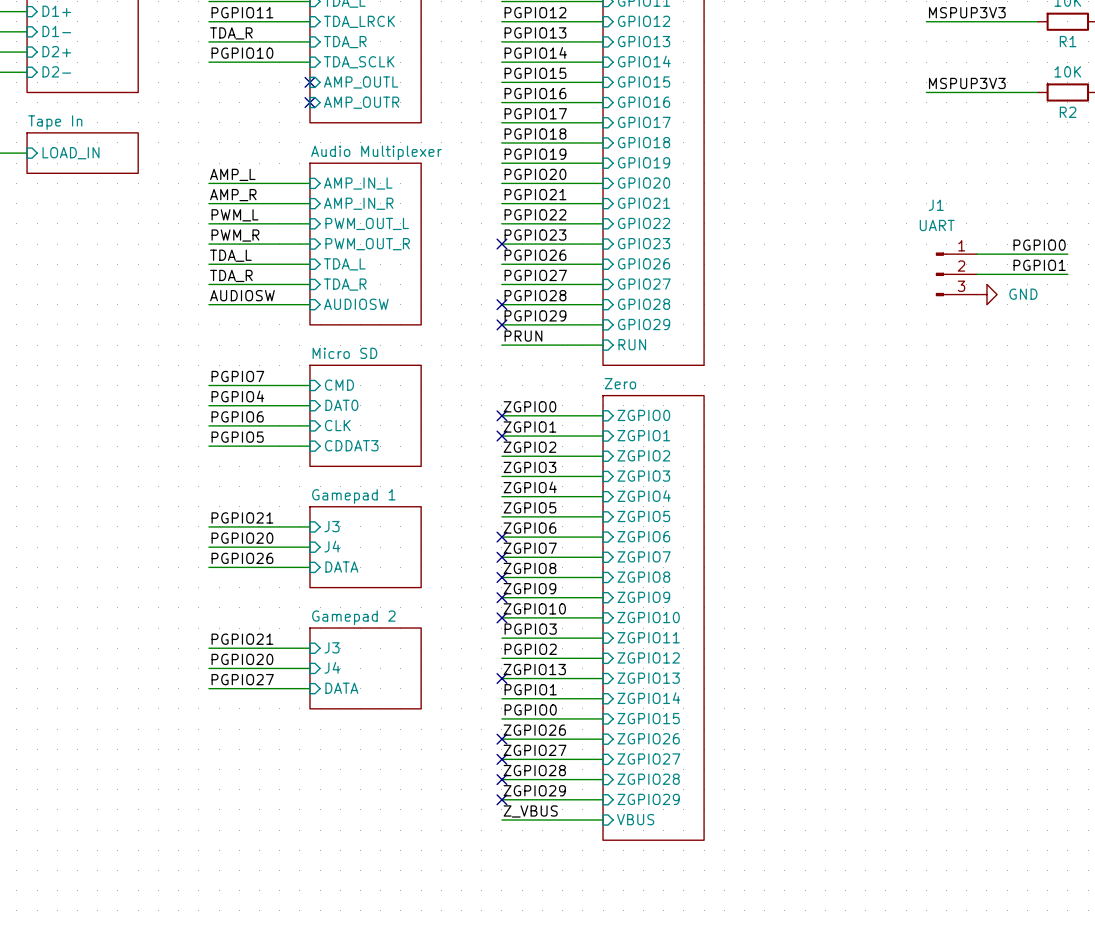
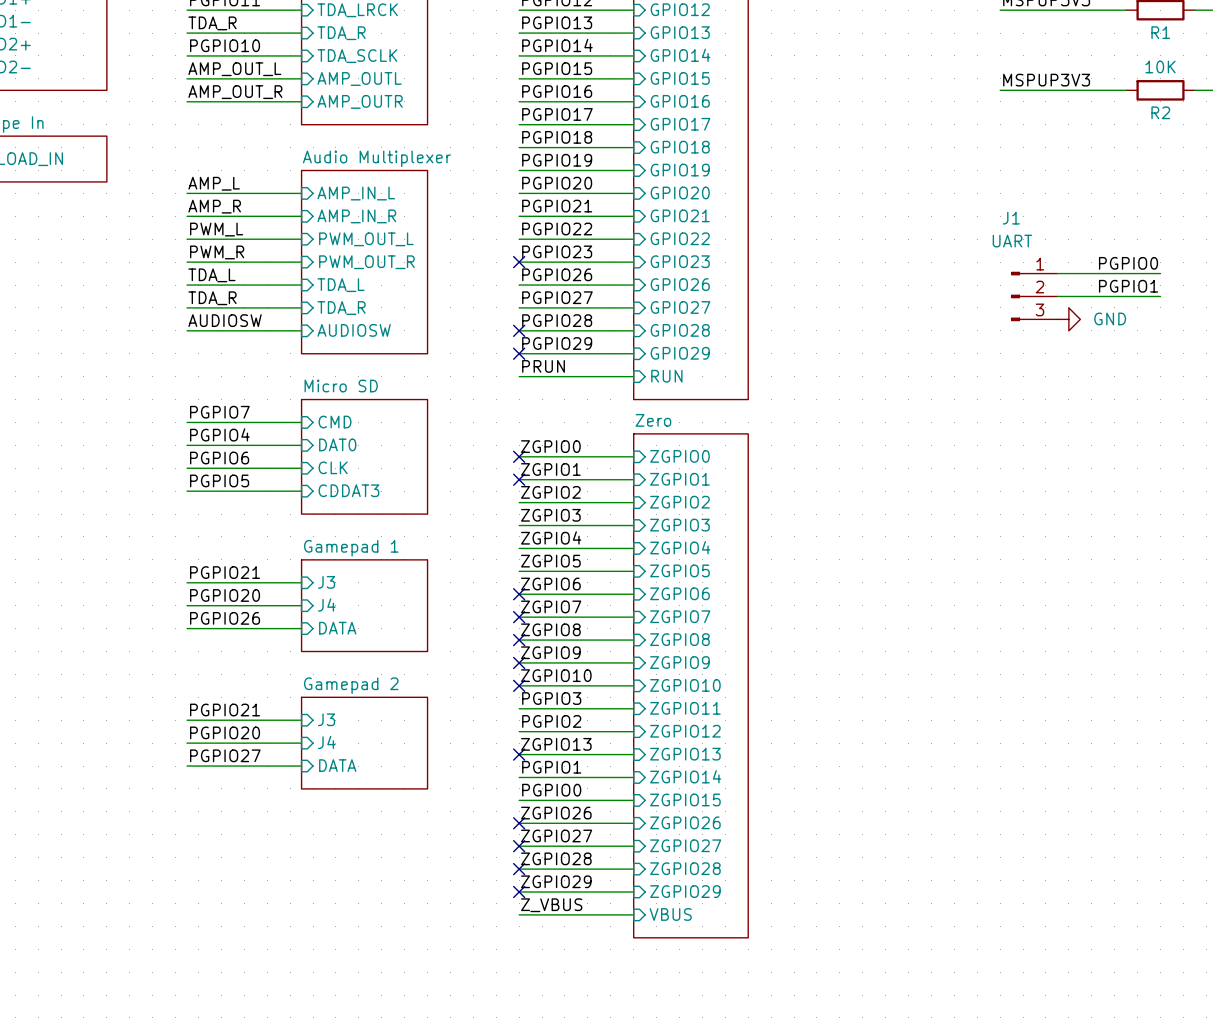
label: none -> AMP_OUT_L (234, 69)
wire: none -> (187, 78) (301, 78)
no-connect mark: (309, 82) -> none
label: none -> AMP_OUT_R (235, 92)
wire: none -> (187, 101) (301, 101)
no-connect mark: (309, 102) -> none

